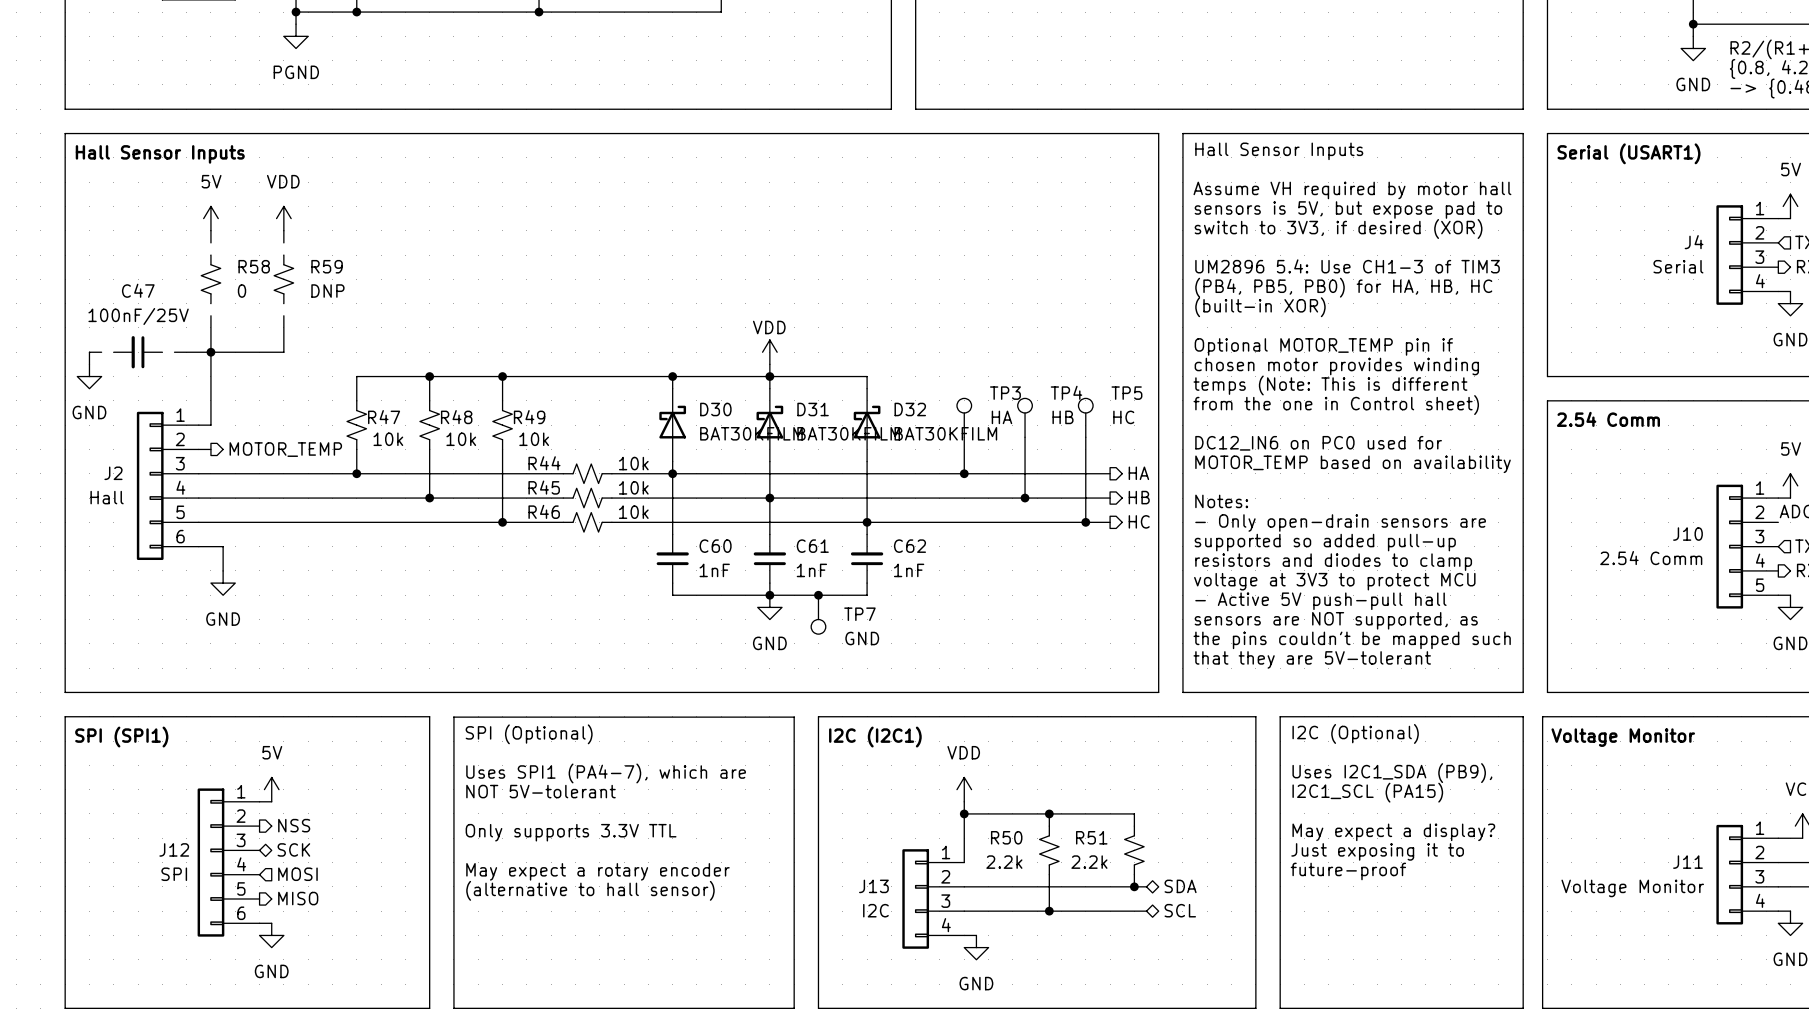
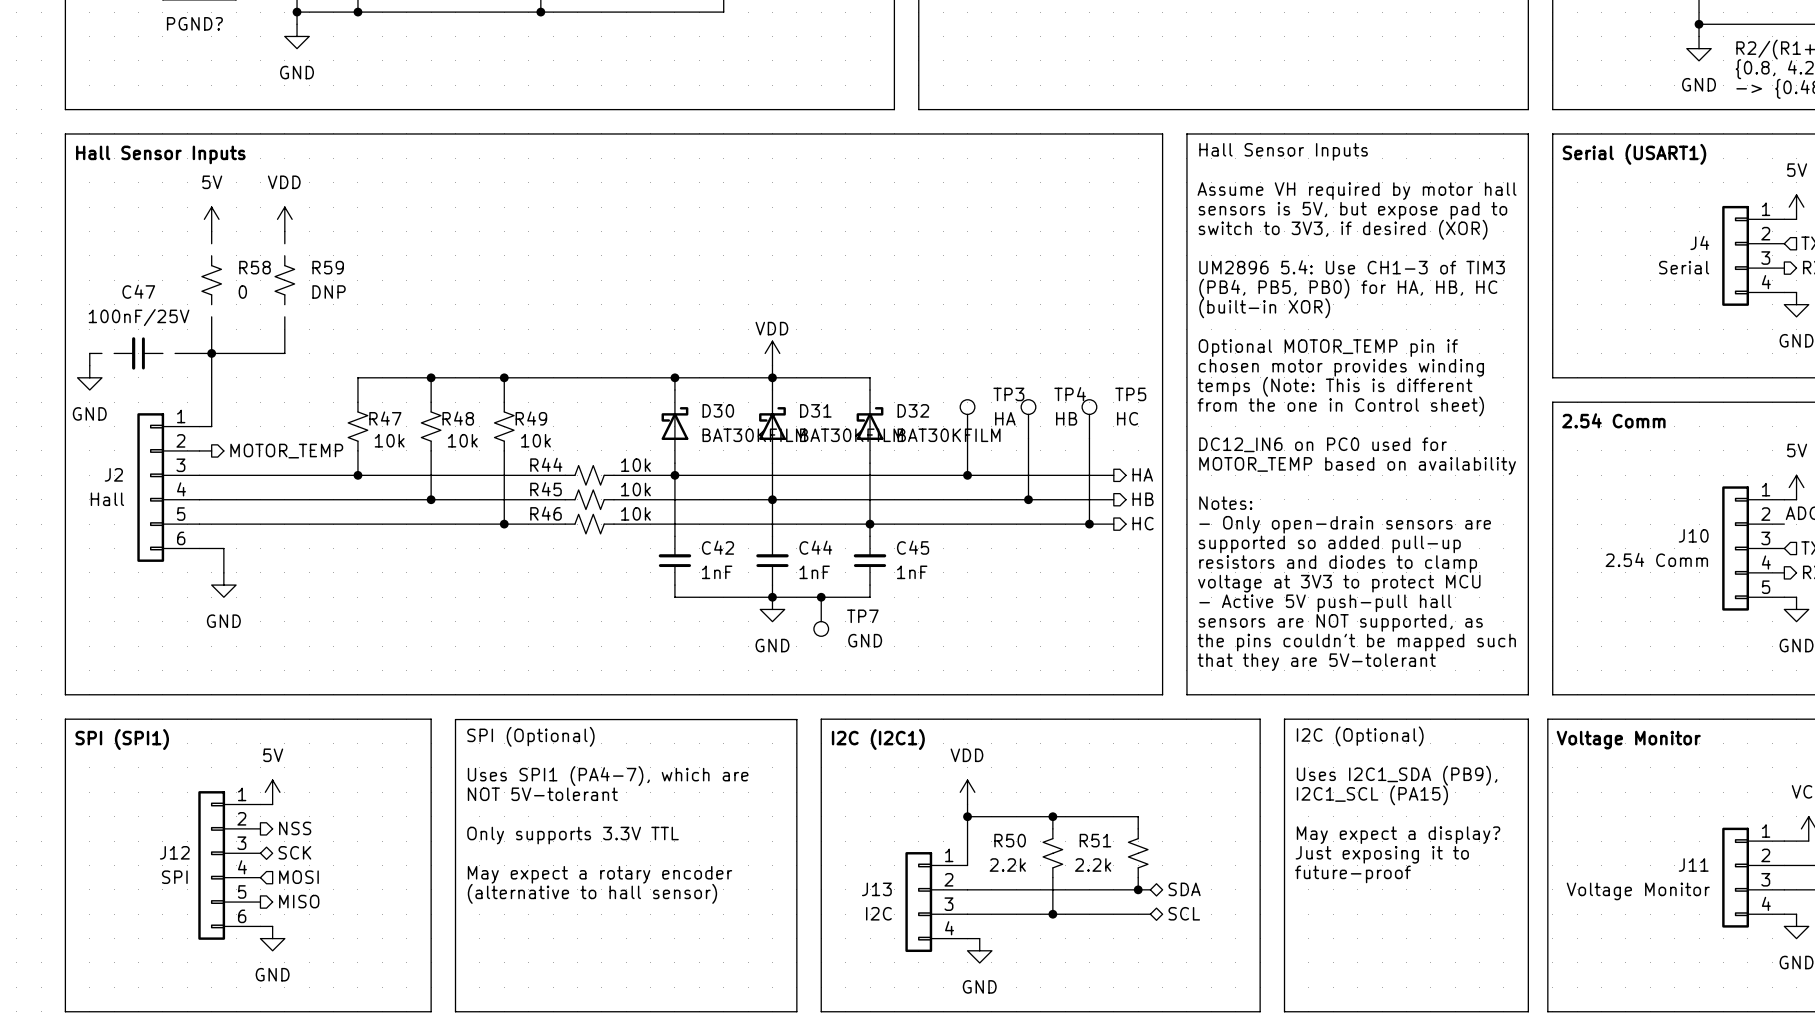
text: none -> PGND? (194, 23)
power symbol: PGND (296, 36) -> GND (297, 36)
C60 name: C60 (715, 546) -> C42 (718, 547)
C61 name: C61 (812, 546) -> C44 (815, 547)
C62 name: C62 (909, 546) -> C45 (913, 547)

